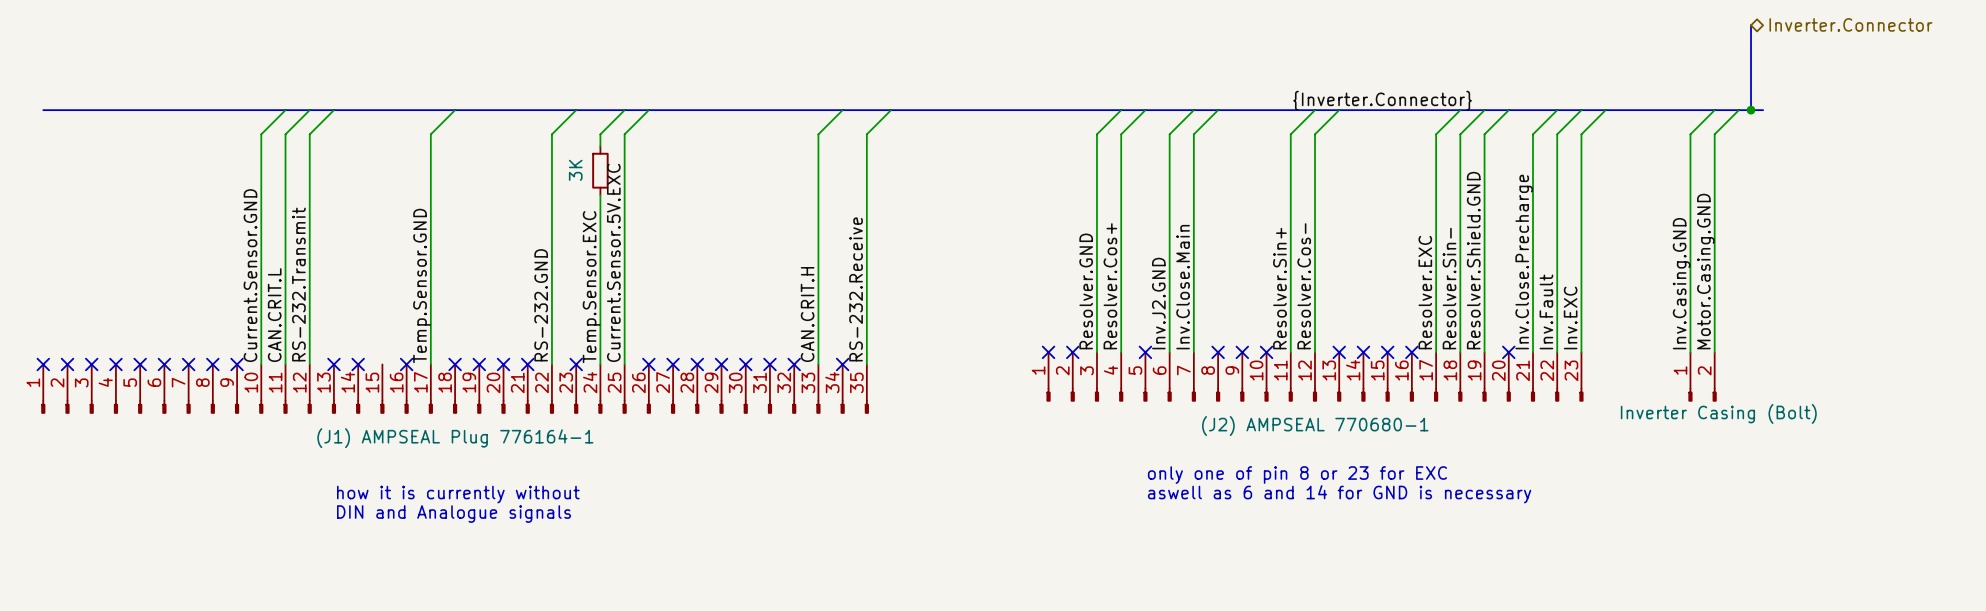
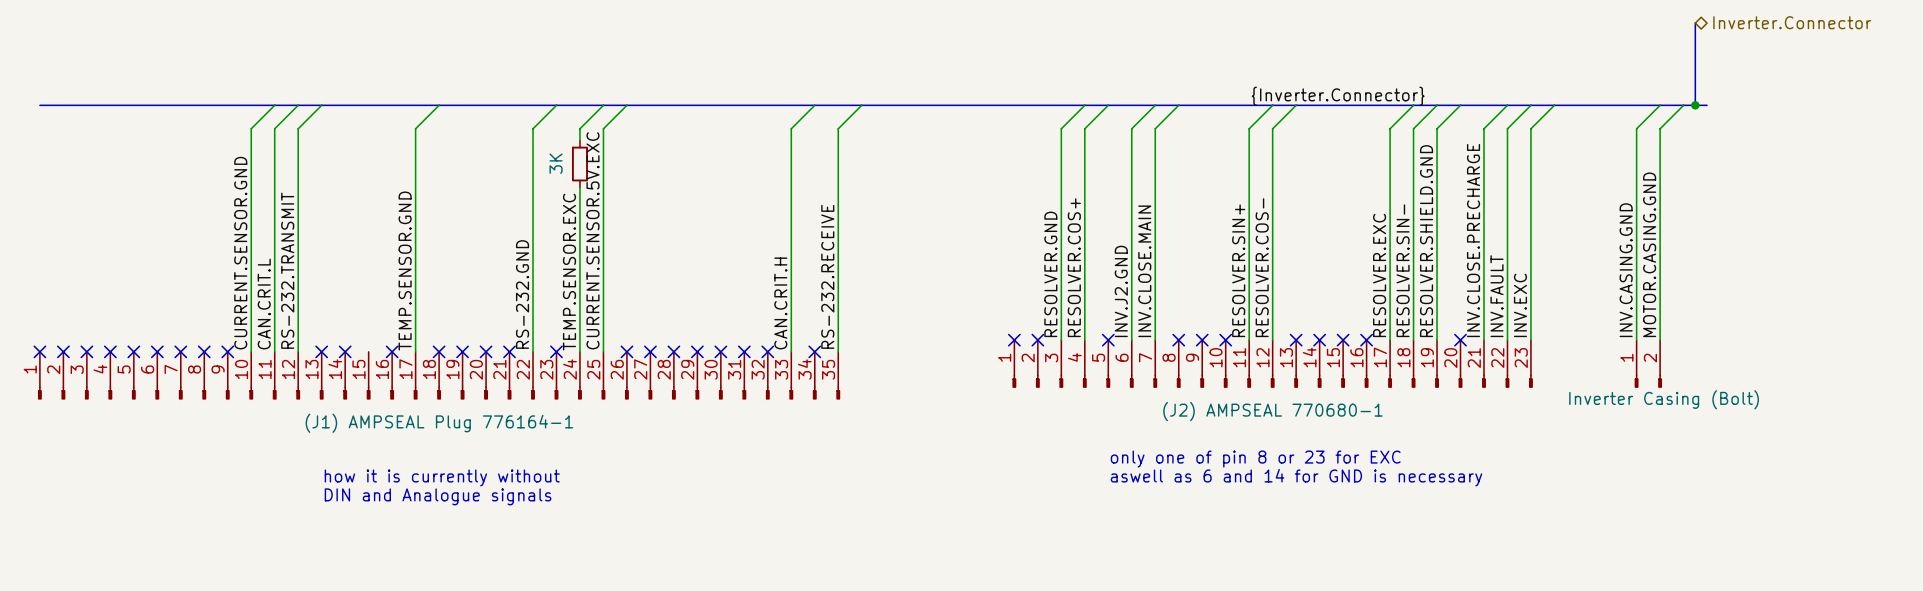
label: Resolver.Shield.GND (1473, 260) -> RESOLVER.SHIELD.GND (1426, 241)
label: Current.Sensor.5V.EXC (613, 262) -> CURRENT.SENSOR.5V.EXC (592, 240)
label: Inv.Close.Precharge (1524, 262) -> INV.CLOSE.PRECHARGE (1473, 240)
label: Motor.Casing.GND (1705, 271) -> MOTOR.CASING.GND (1649, 254)
label: Current.Sensor.GND (250, 275) -> CURRENT.SENSOR.GND (240, 253)
label: Inv.Casing.GND (1681, 283) -> INV.CASING.GND (1626, 270)
label: RS-232.Transmit (298, 284) -> RS-232.TRANSMIT (287, 270)
label: Temp.Sensor.GND (422, 285) -> TEMP.SENSOR.GND (405, 271)
label: Resolver.Cos+ (1110, 286) -> RESOLVER.COS+ (1074, 267)
label: Resolver.Cos- (1304, 286) -> RESOLVER.COS- (1262, 267)
label: Temp.Sensor.EXC (591, 287) -> TEMP.SENSOR.EXC (569, 272)
label: Inv.Close.Main (1183, 287) -> INV.CLOSE.MAIN (1144, 271)
label: Resolver.Sin+ (1279, 288) -> RESOLVER.SIN+ (1238, 270)
label: Resolver.Sin- (1449, 288) -> RESOLVER.SIN- (1403, 270)
label: RS-232.Receive (856, 289) -> RS-232.RECEIVE (827, 276)
label: Resolver.GND (1086, 291) -> RESOLVER.GND (1050, 274)
label: Resolver.EXC (1425, 292) -> RESOLVER.EXC (1379, 275)
label: Inv.J2.GND (1158, 303) -> INV.J2.GND (1121, 291)
label: Inv.Fault (1546, 311) -> INV.FAULT (1496, 296)
label: Inv.EXC (1570, 317) -> INV.EXC (1520, 305)

